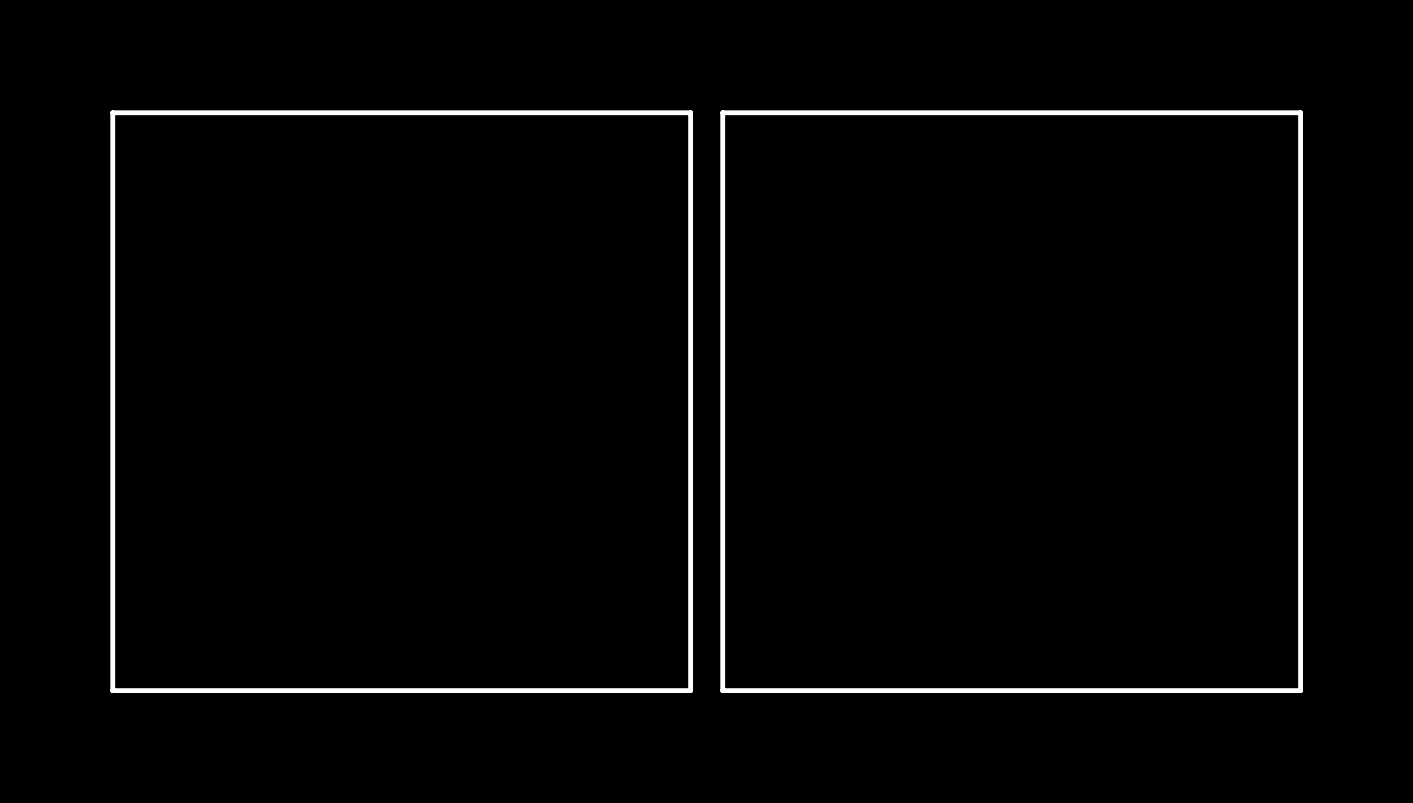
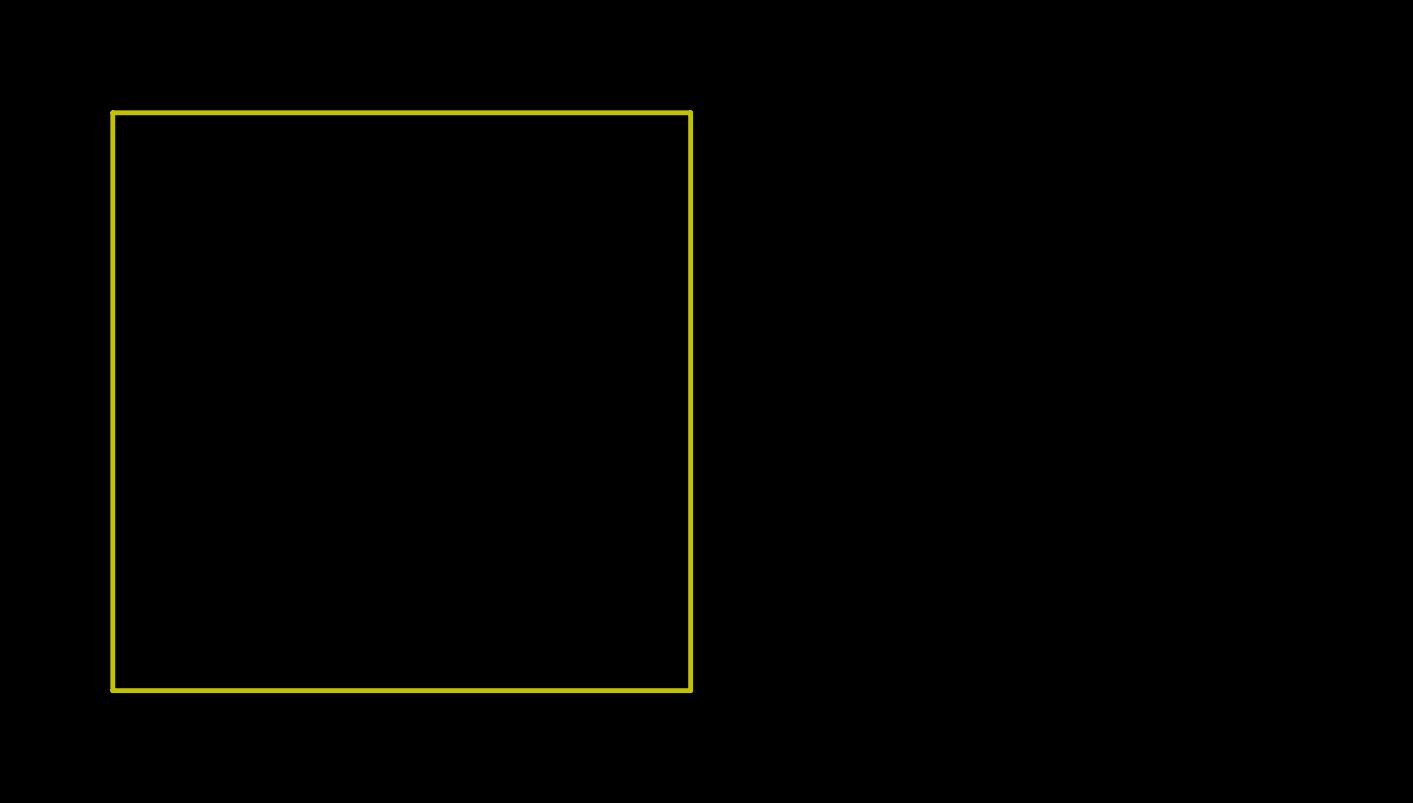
board edge: (722, 112) (1300, 112) (1300, 690) (722, 690) (722, 112) -> none

